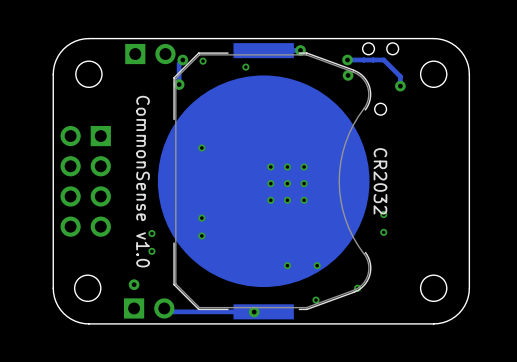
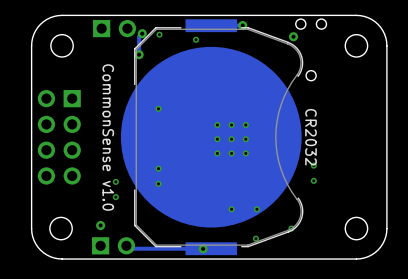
track: (363, 59) (347, 59) -> none
track: (373, 59) (383, 59) (400, 76) (400, 86) -> none
via: (347, 60) -> none
track: (373, 60) (363, 60) -> none
via: none -> (293, 36)
via: (348, 75) -> none
via: (400, 86) -> none

